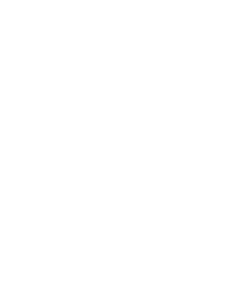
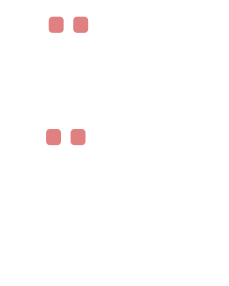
part: none -> (68, 24)
part: none -> (65, 137)

